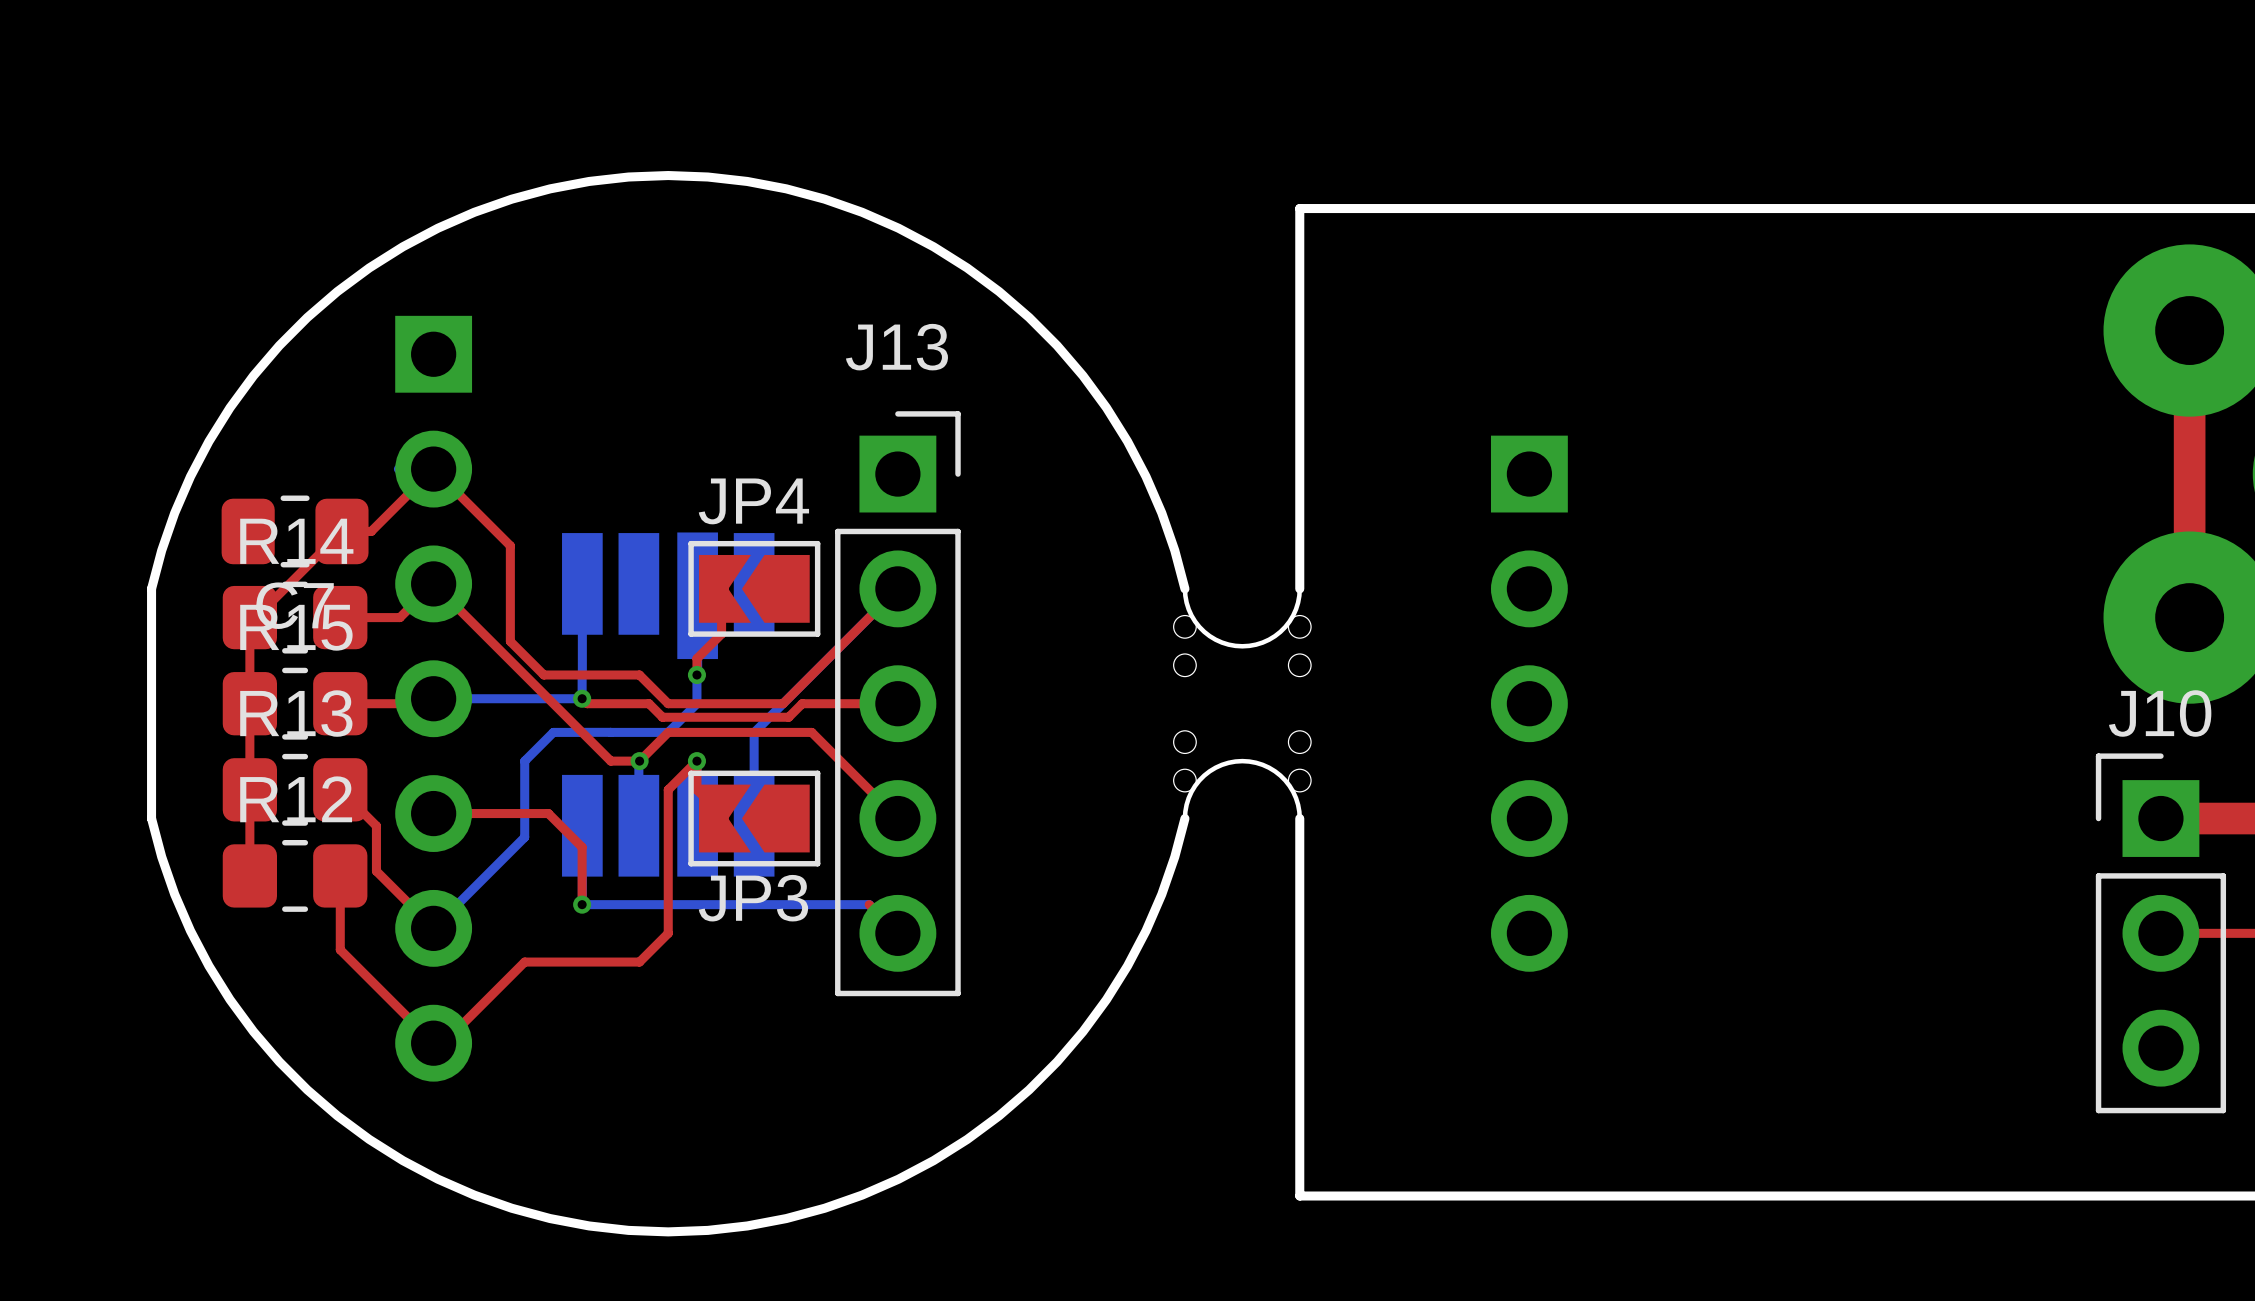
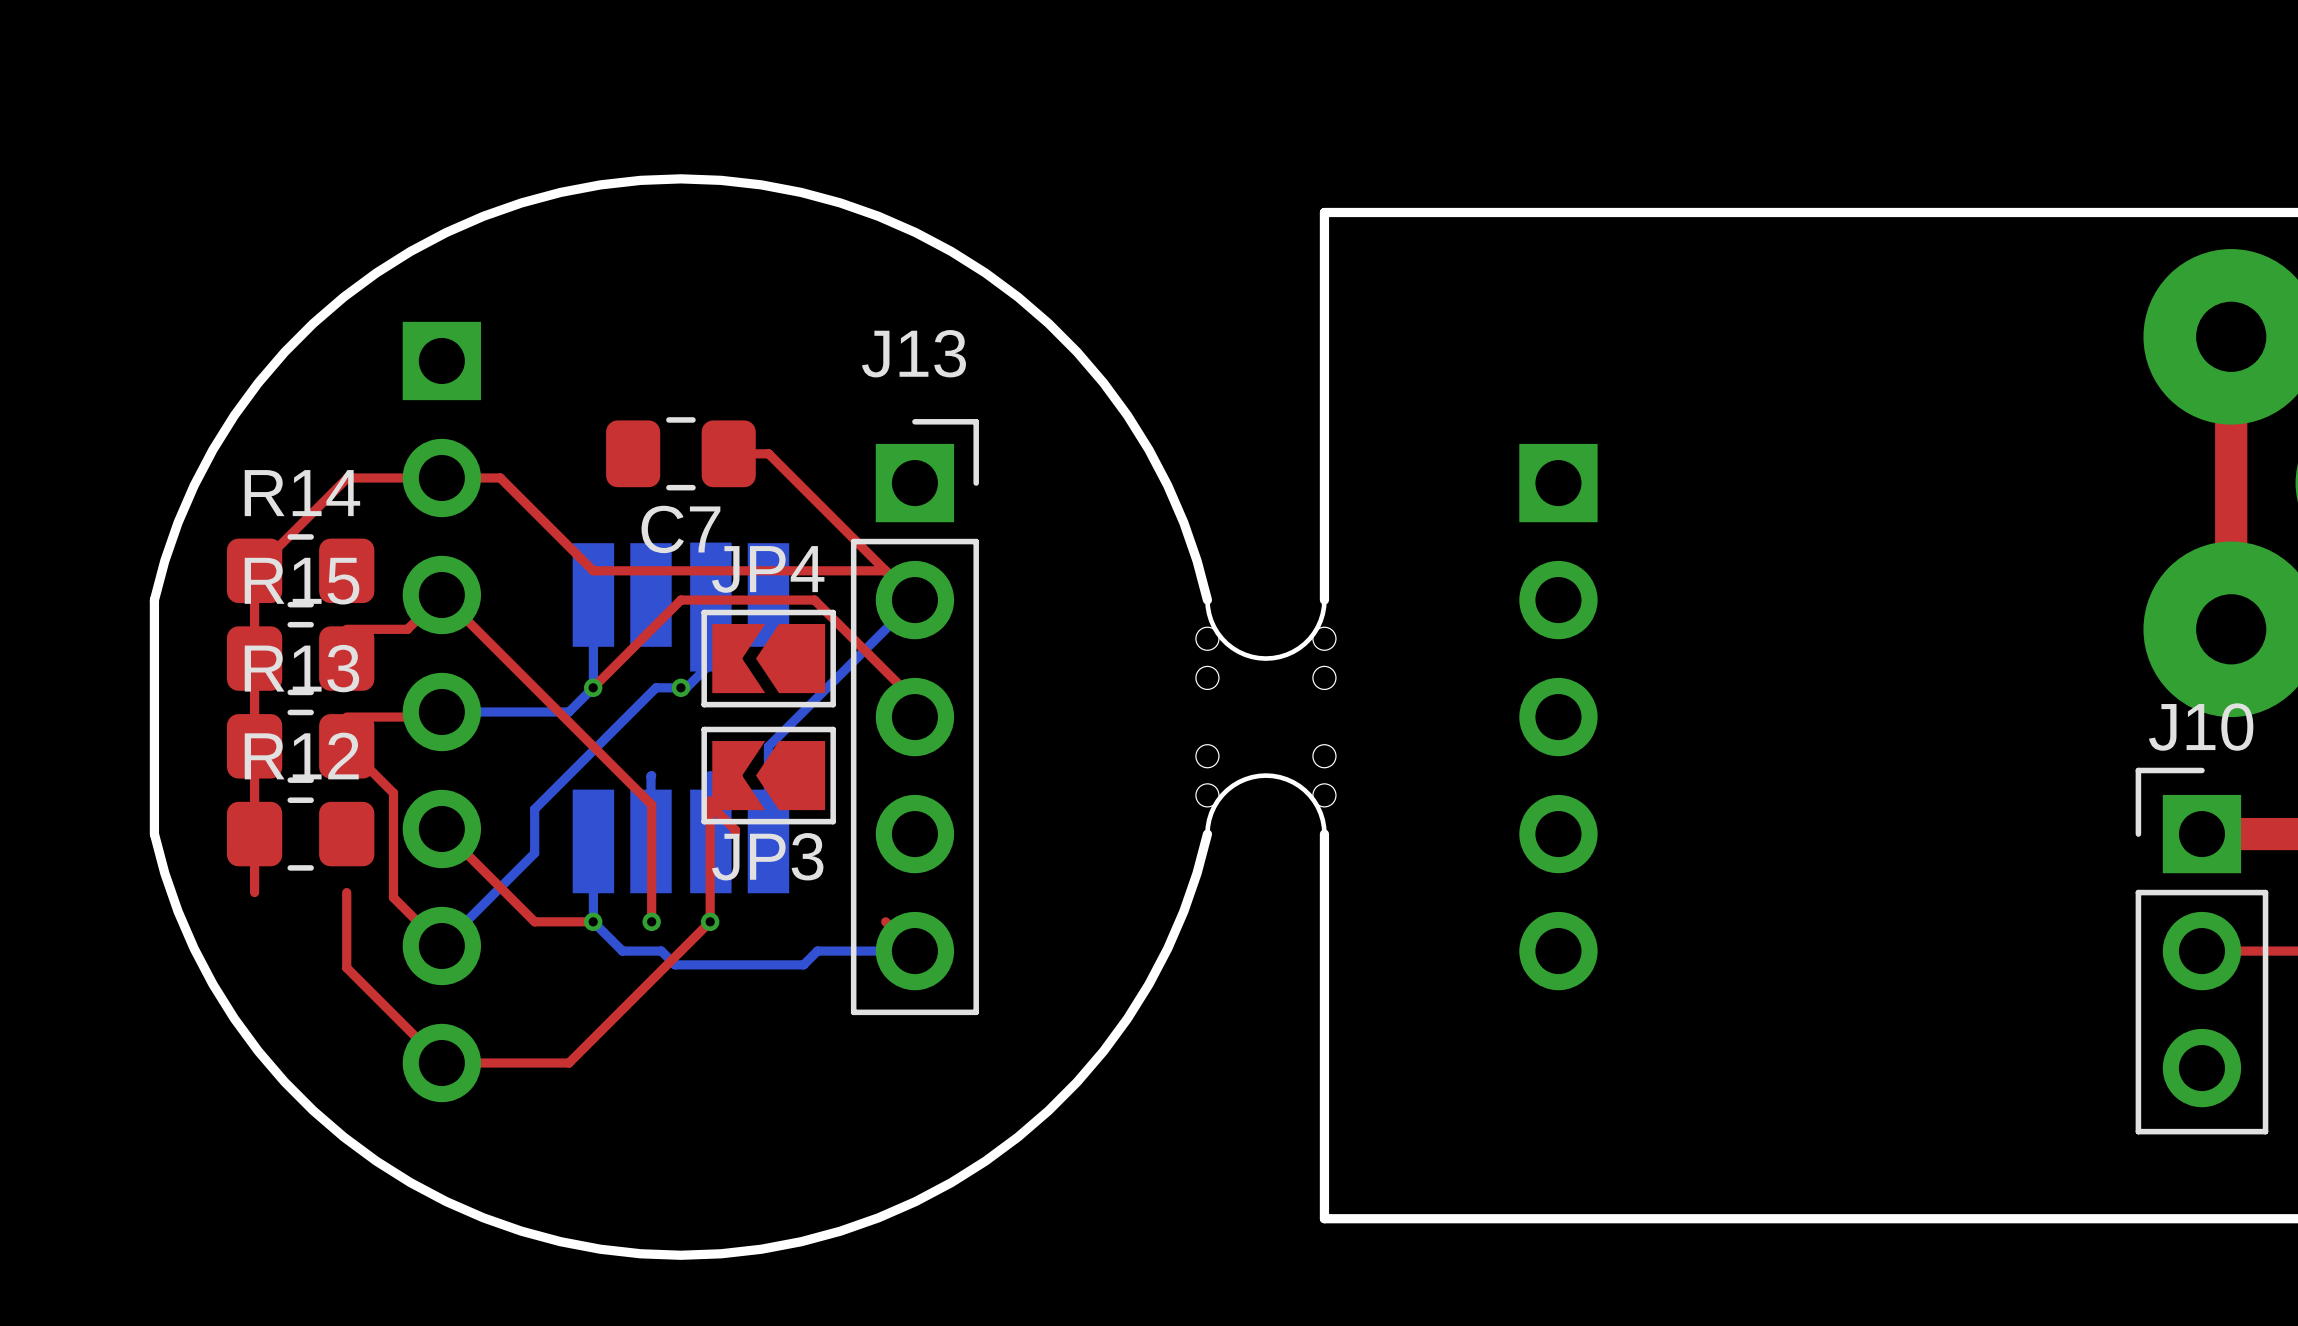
C7 position: (295, 531) -> (680, 453)
top track: none -> (885, 570) (593, 570) (500, 477) (347, 477) (254, 570) (254, 658)
top track: (721, 588) (721, 633) (696, 658) (696, 675) -> none
JP4 position: (754, 588) -> (768, 658)
top track: (897, 588) (783, 703) (668, 703) (639, 675) (543, 675) (510, 641) (510, 545) (433, 469) (371, 531) (341, 531) (255, 617) (249, 617) -> (914, 600) (768, 453) (728, 453) (728, 464)
R14 position: (295, 617) -> (300, 570)
bottom track: (697, 651) (696, 703) (668, 732) (553, 732) (524, 761) (524, 794) -> (710, 663) (686, 687) (656, 687) (534, 809)
bottom track: (582, 675) (582, 698) (558, 698) -> (593, 687) (569, 712)
via position: (696, 675) -> (680, 687)
top track: (582, 698) (587, 703) (649, 703) (662, 717) (788, 717) (802, 703) (897, 703) -> (593, 687) (680, 600) (814, 600) (914, 700) (914, 717)
via position: (582, 698) -> (593, 687)
R15 position: (295, 703) -> (300, 658)
top track: (610, 761) (639, 761) (668, 732) (811, 732) (897, 818) -> (622, 775) (651, 804) (651, 921)
via: (639, 761) -> none
via: (696, 761) -> none
top track: (696, 785) (696, 761) (668, 789) (668, 933) -> (710, 804) (710, 921) (680, 951)
R13 position: (295, 789) -> (300, 746)
top track: (340, 789) (376, 825) (376, 871) (386, 880) -> (346, 746) (393, 793) (393, 897)
top track: (433, 813) (548, 813) (582, 847) (582, 904) -> (441, 829) (534, 921) (593, 921)
JP3 position: (754, 818) -> (768, 775)
R12 position: (295, 875) -> (300, 834)
bottom track: (582, 904) (869, 904) (897, 933) -> (593, 921) (622, 951) (661, 951) (675, 964) (803, 964) (817, 951) (914, 951)
via: none -> (651, 921)
via: none -> (710, 921)
top track: (639, 962) (524, 962) (443, 1043) -> (651, 980) (569, 1063) (452, 1063)

